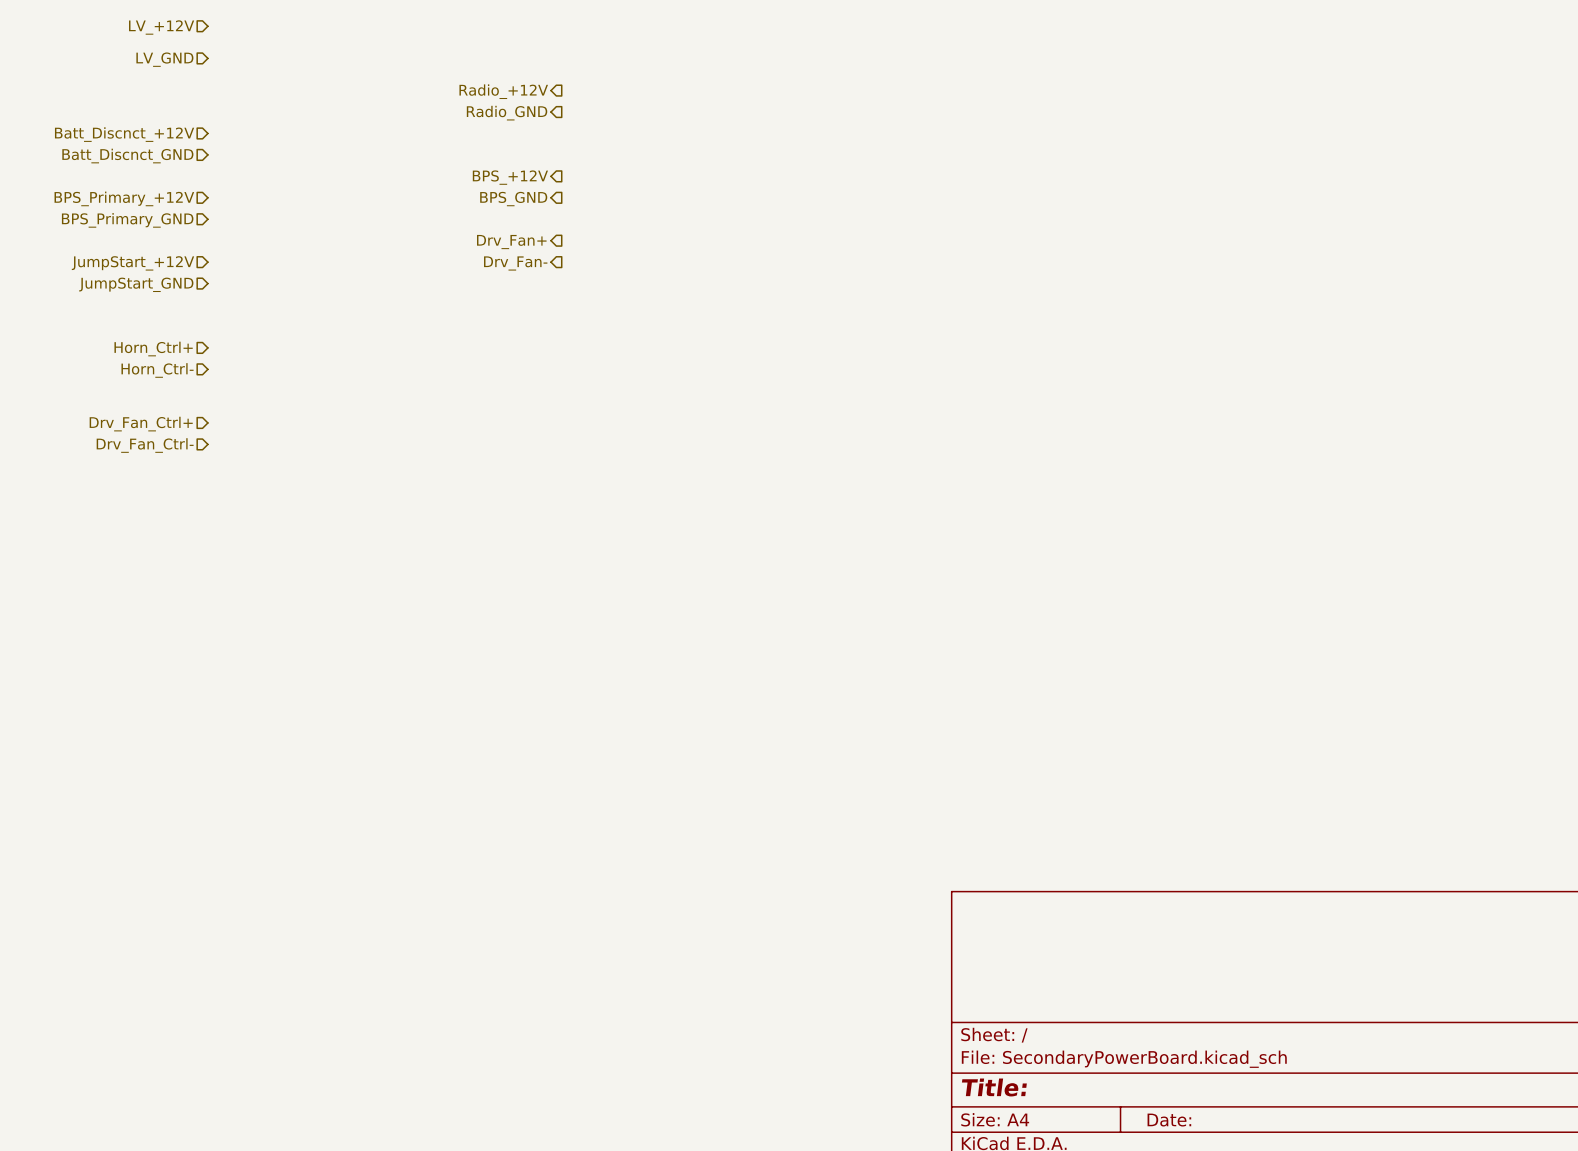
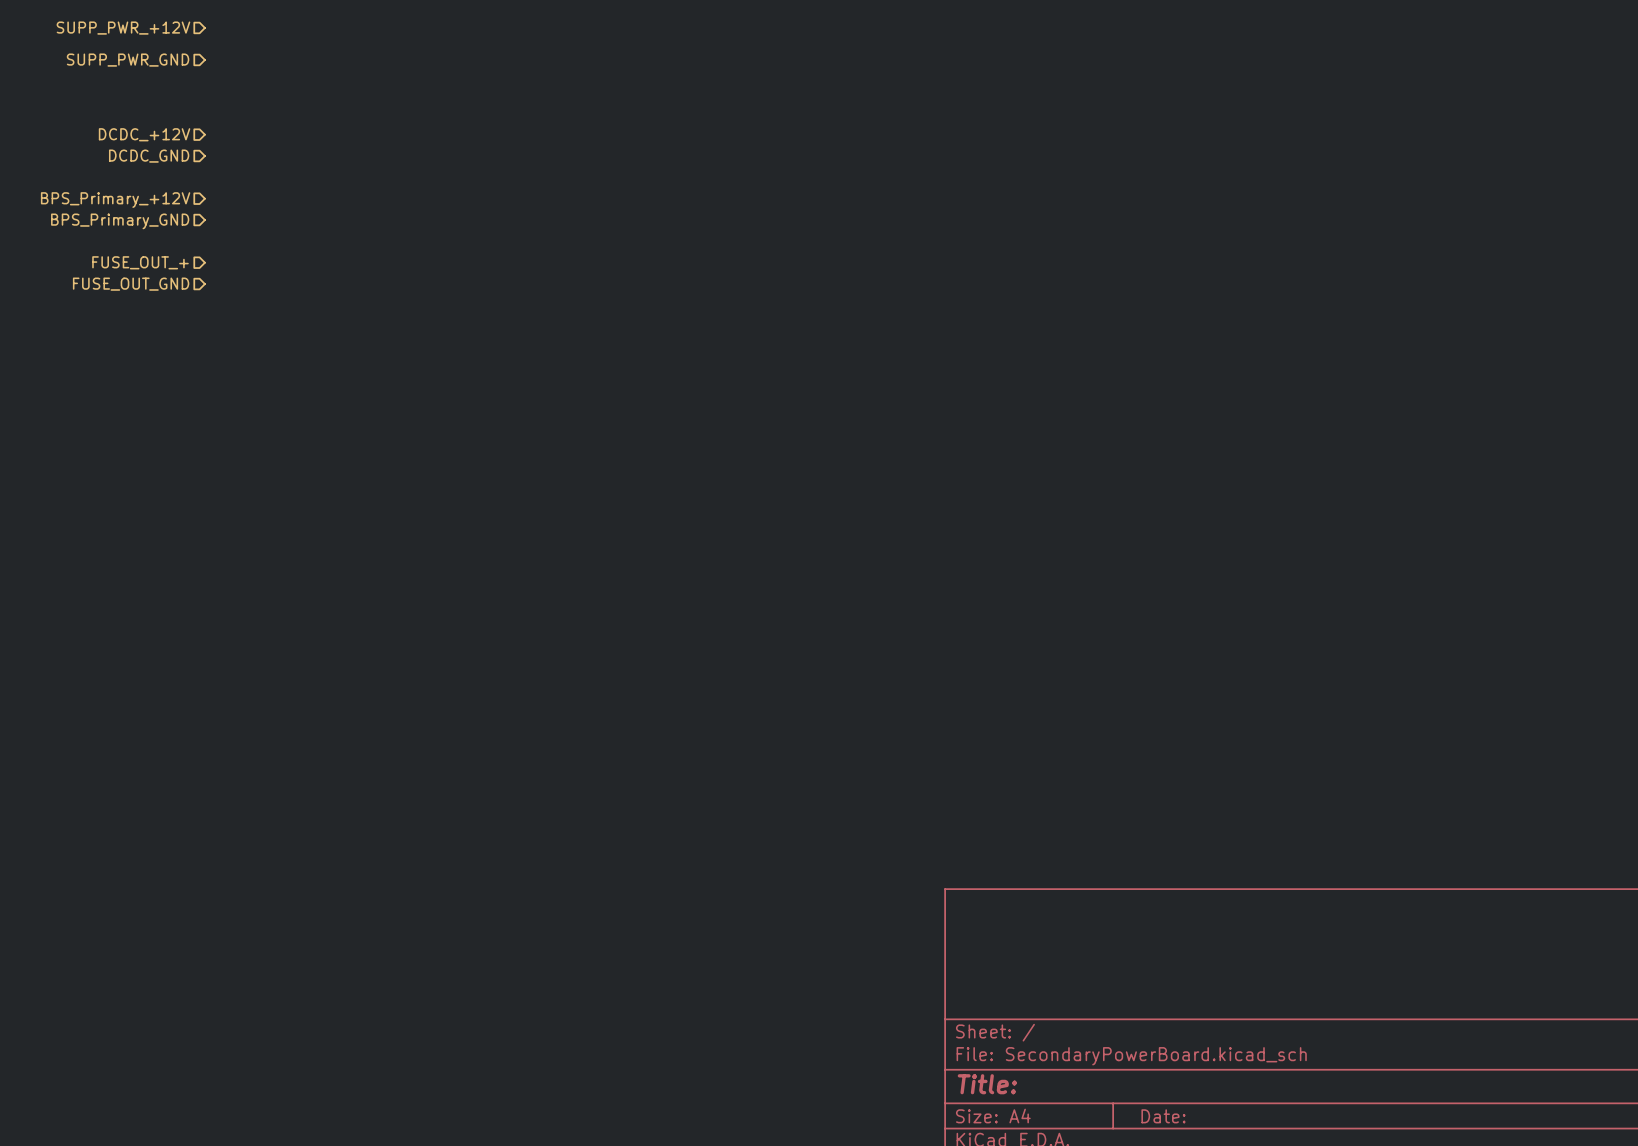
hierarchical label: LV_+12V (161, 27) -> SUPP_PWR_+12V (123, 28)
hierarchical label: LV_GND (164, 59) -> SUPP_PWR_GND (128, 60)
hierarchical label: Radio_+12V (503, 91) -> none
hierarchical label: Radio_GND (507, 113) -> none
hierarchical label: Batt_Discnct_+12V (124, 134) -> DCDC_+12V (144, 134)
hierarchical label: Batt_Discnct_GND (127, 156) -> DCDC_GND (149, 156)
hierarchical label: BPS_+12V (510, 177) -> none
hierarchical label: BPS_GND (513, 199) -> none
hierarchical label: Drv_Fan+ (511, 242) -> none
hierarchical label: JumpStart_+12V (132, 263) -> FUSE_OUT_+ (140, 262)
hierarchical label: Drv_Fan- (515, 263) -> none
hierarchical label: JumpStart_GND (136, 284) -> FUSE_OUT_GND (131, 284)
hierarchical label: Horn_Ctrl+ (153, 349) -> none
hierarchical label: Horn_Ctrl- (157, 370) -> none
hierarchical label: Drv_Fan_Ctrl+ (141, 424) -> none
hierarchical label: Drv_Fan_Ctrl- (145, 445) -> none

